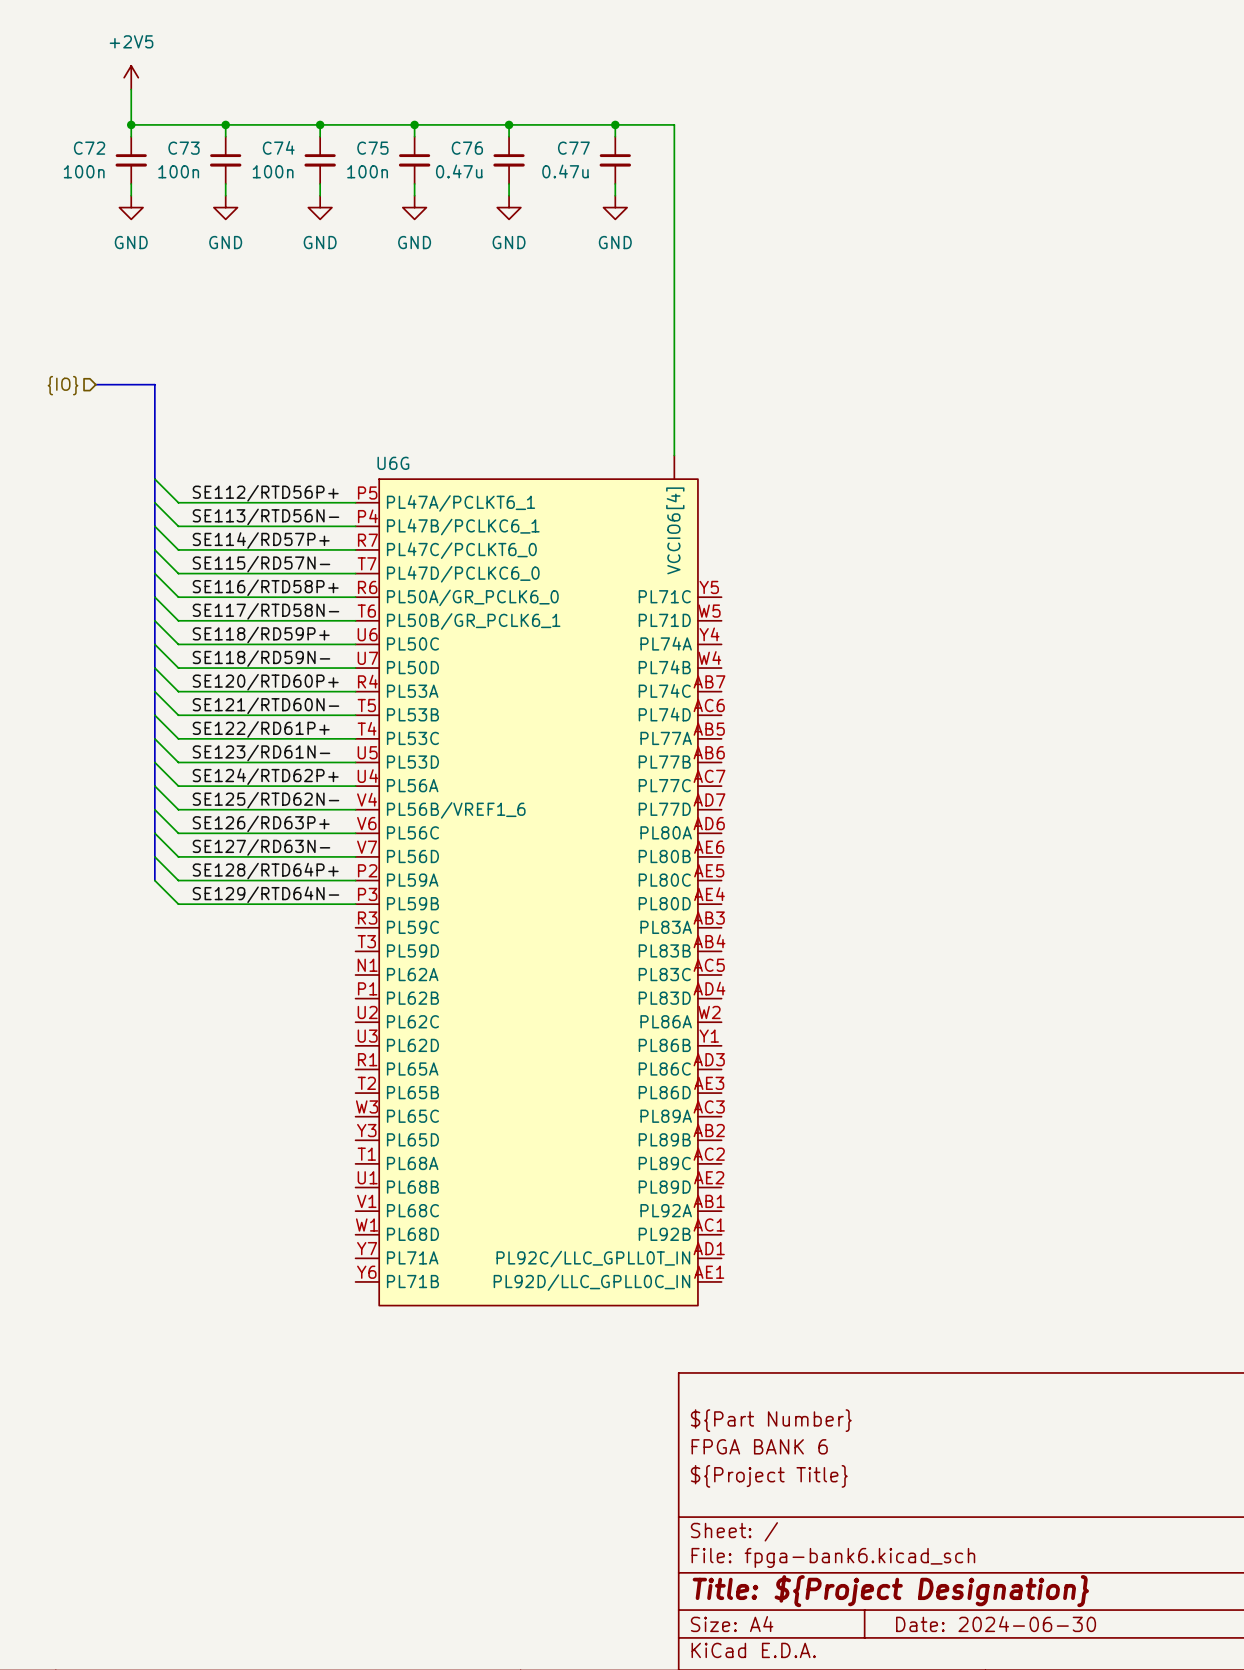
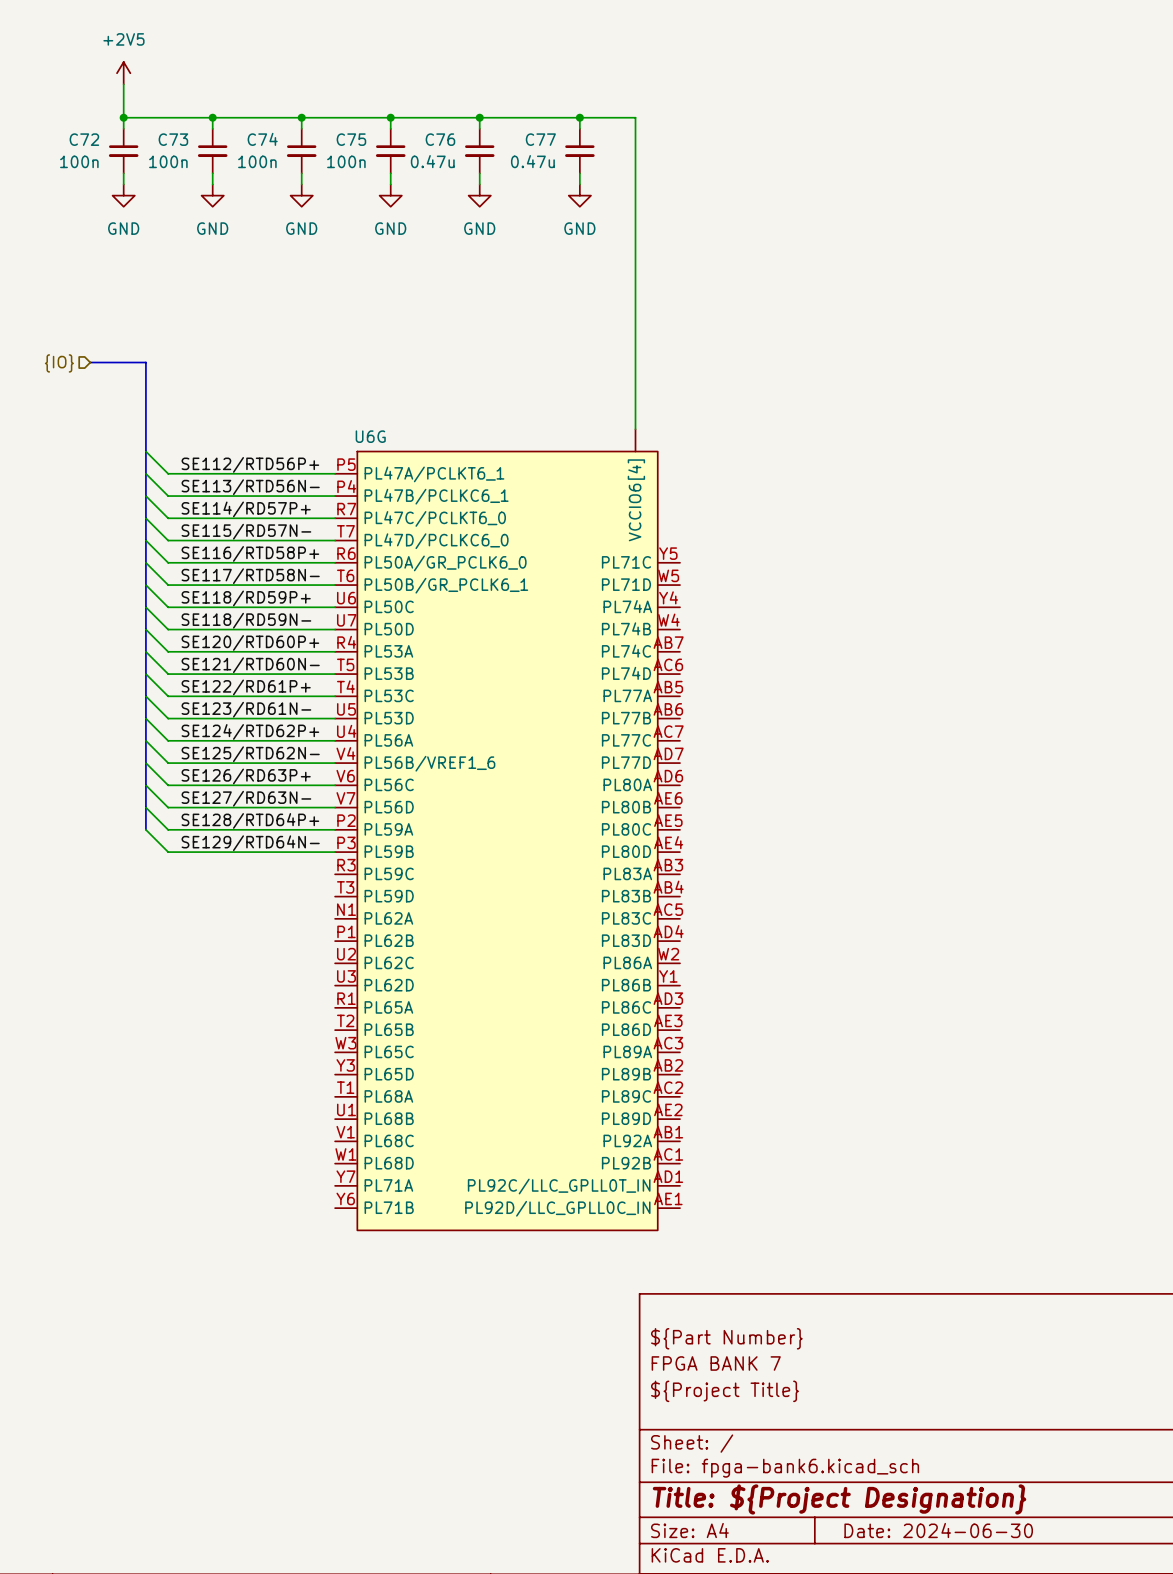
title block: FPGA BANK 6 (759, 1446) -> FPGA BANK 7 (716, 1363)

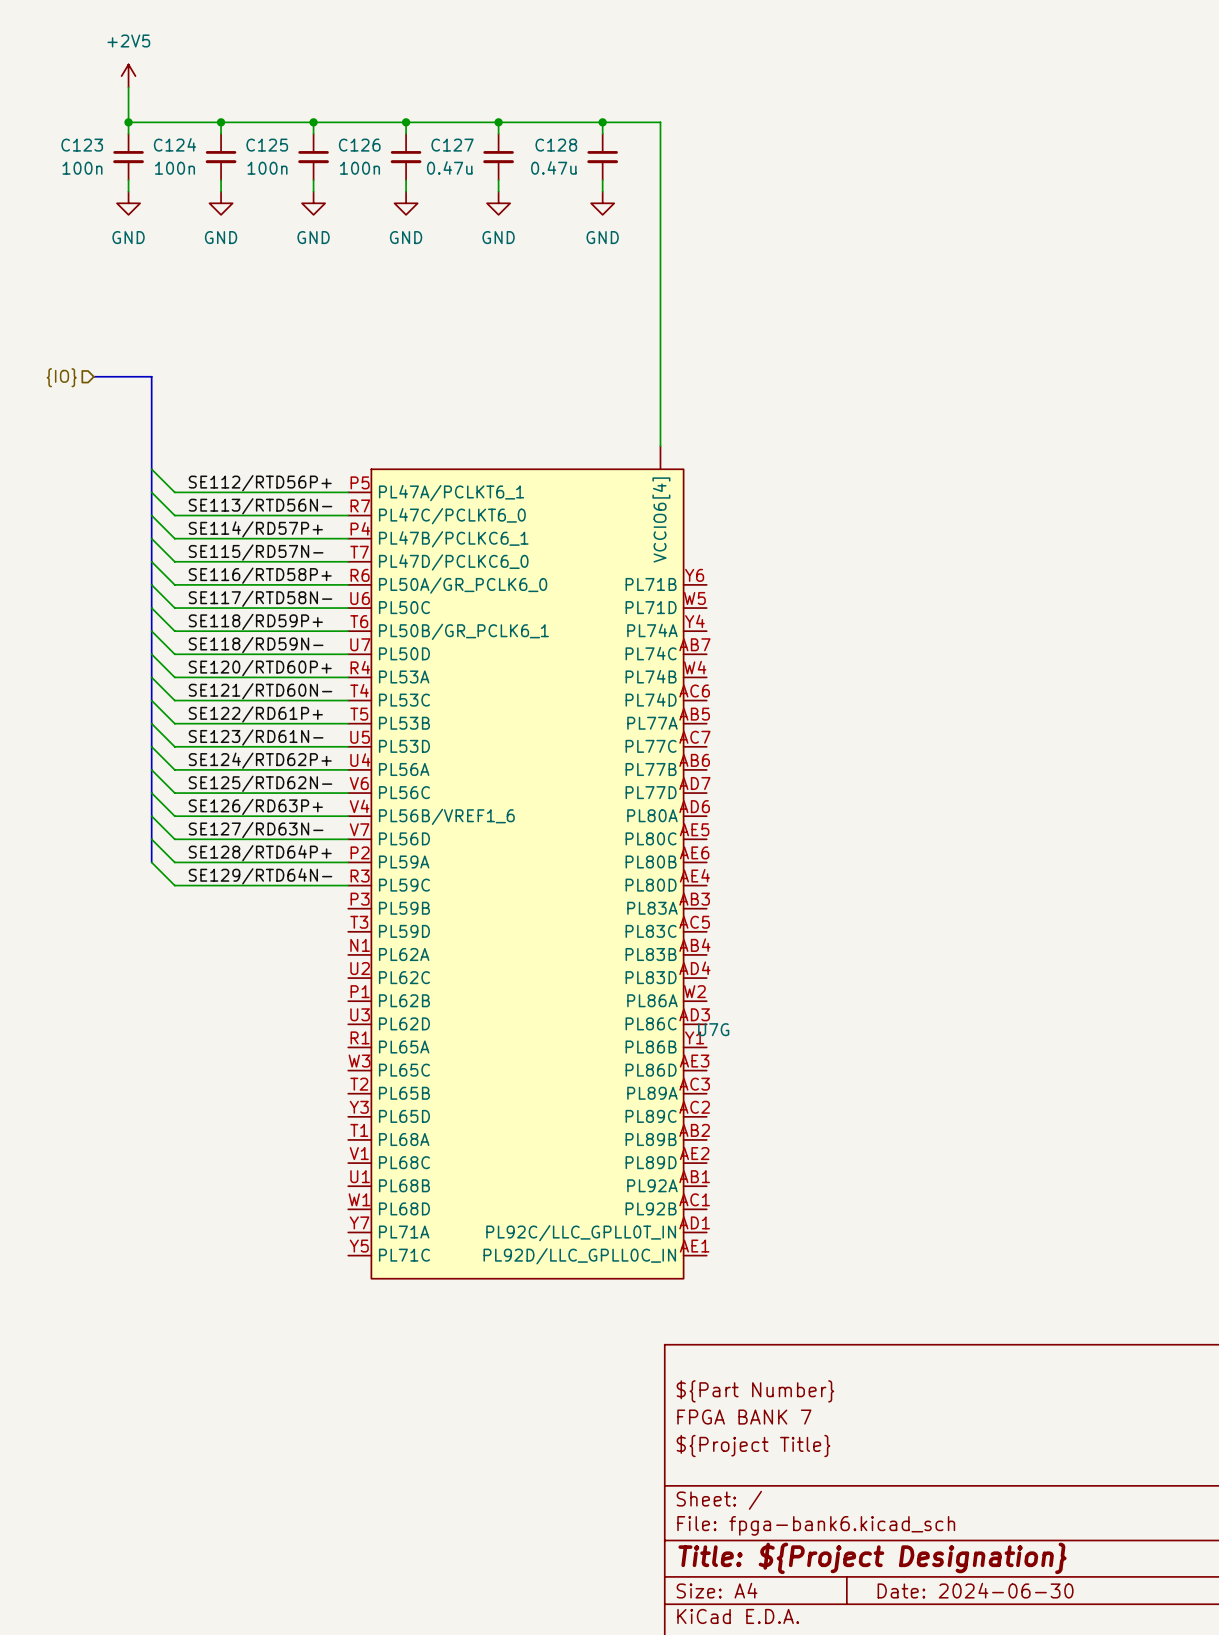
C72 name: C72 (84, 139) -> C123 (82, 145)
C73 name: C73 (173, 139) -> C124 (174, 144)
C74 name: C74 (262, 139) -> C125 (267, 145)
C75 name: C75 (351, 139) -> C126 (359, 145)
C76 name: C76 (440, 139) -> C127 (452, 145)
C77 name: C77 (540, 139) -> C128 (556, 145)
U6G symbol: [335, 429, 681, 1231] -> [348, 446, 707, 1279]
U6G name: U6G (370, 436) -> U7G (713, 1029)

